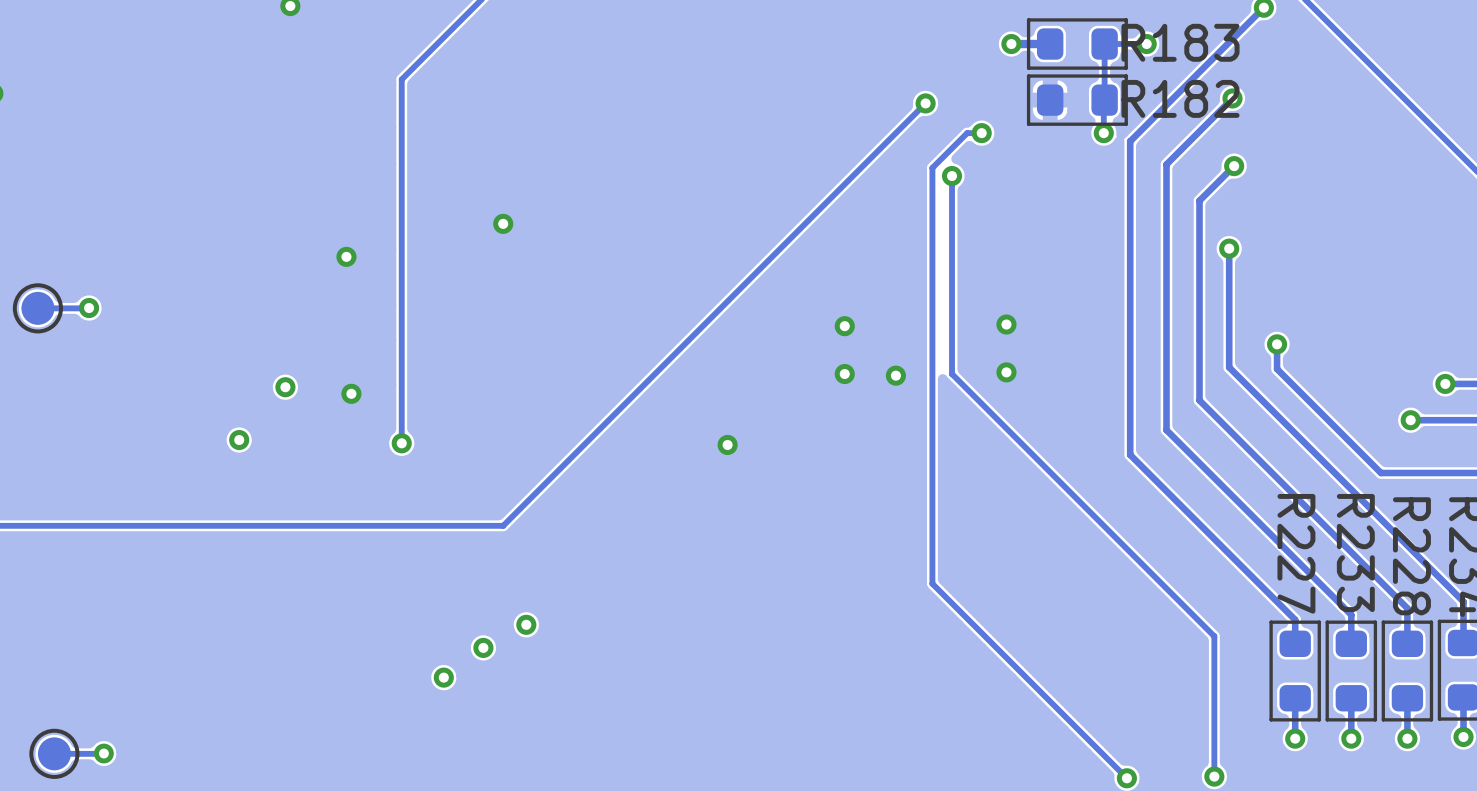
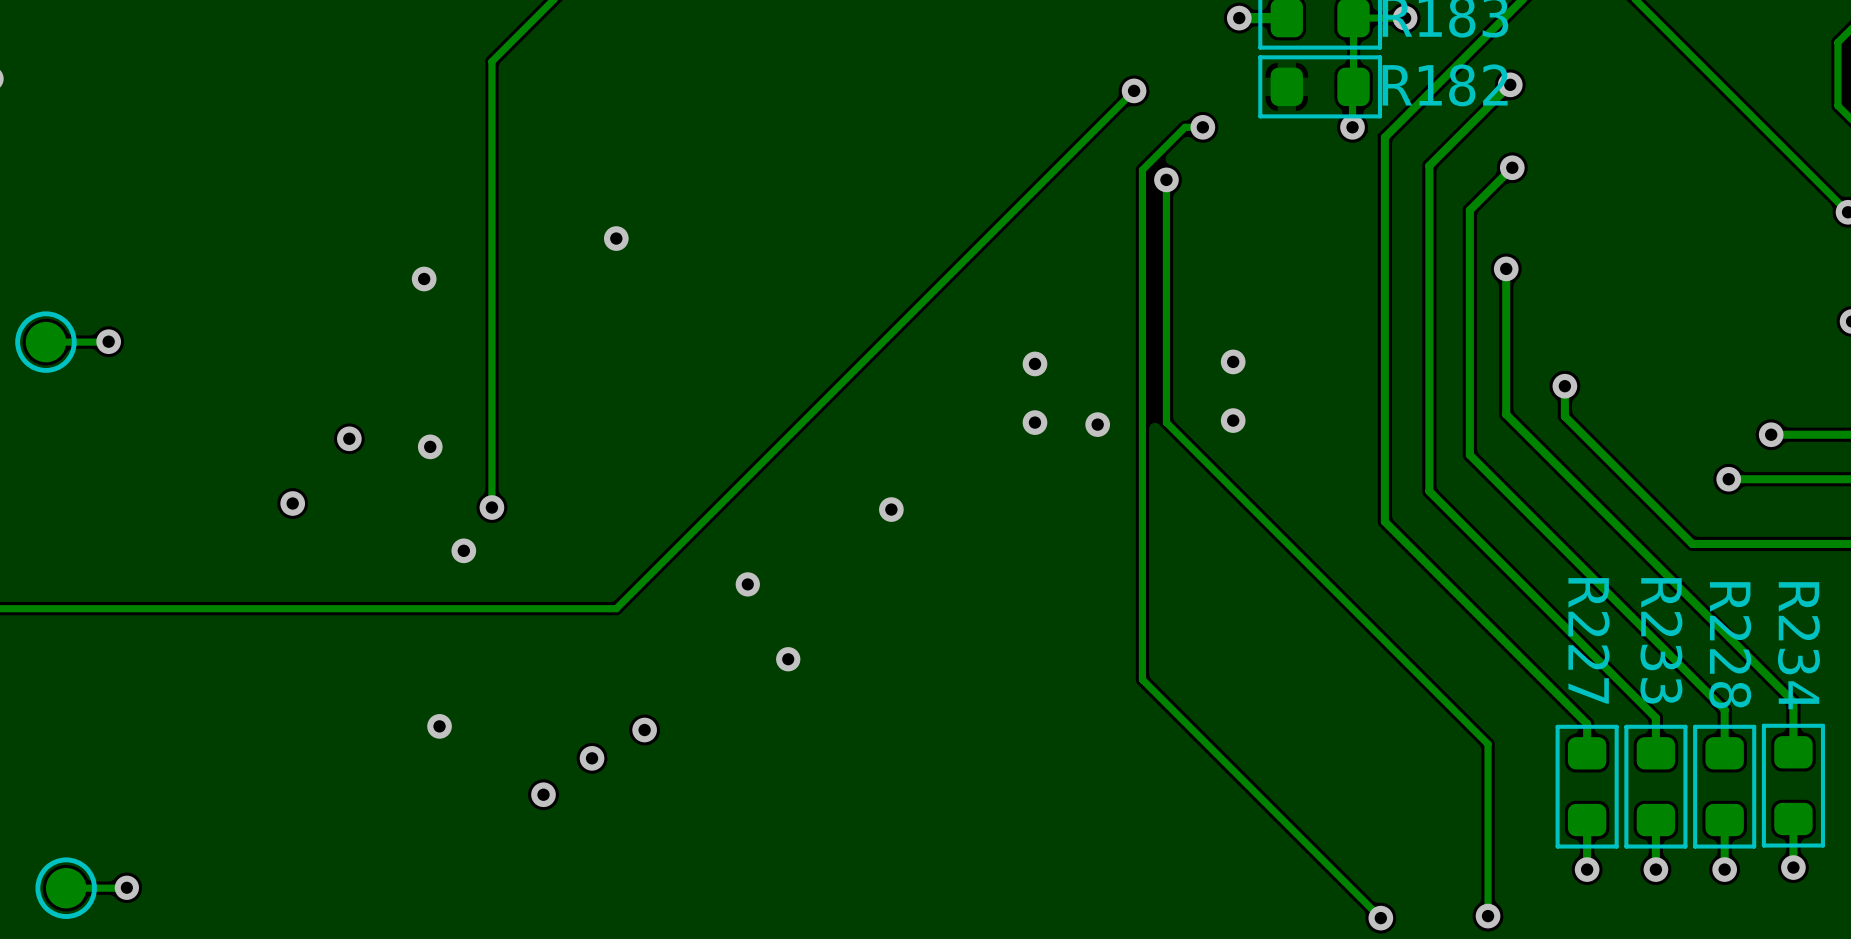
via: none -> (463, 550)
via: none -> (747, 584)
via: none -> (788, 659)
via: none -> (439, 726)

